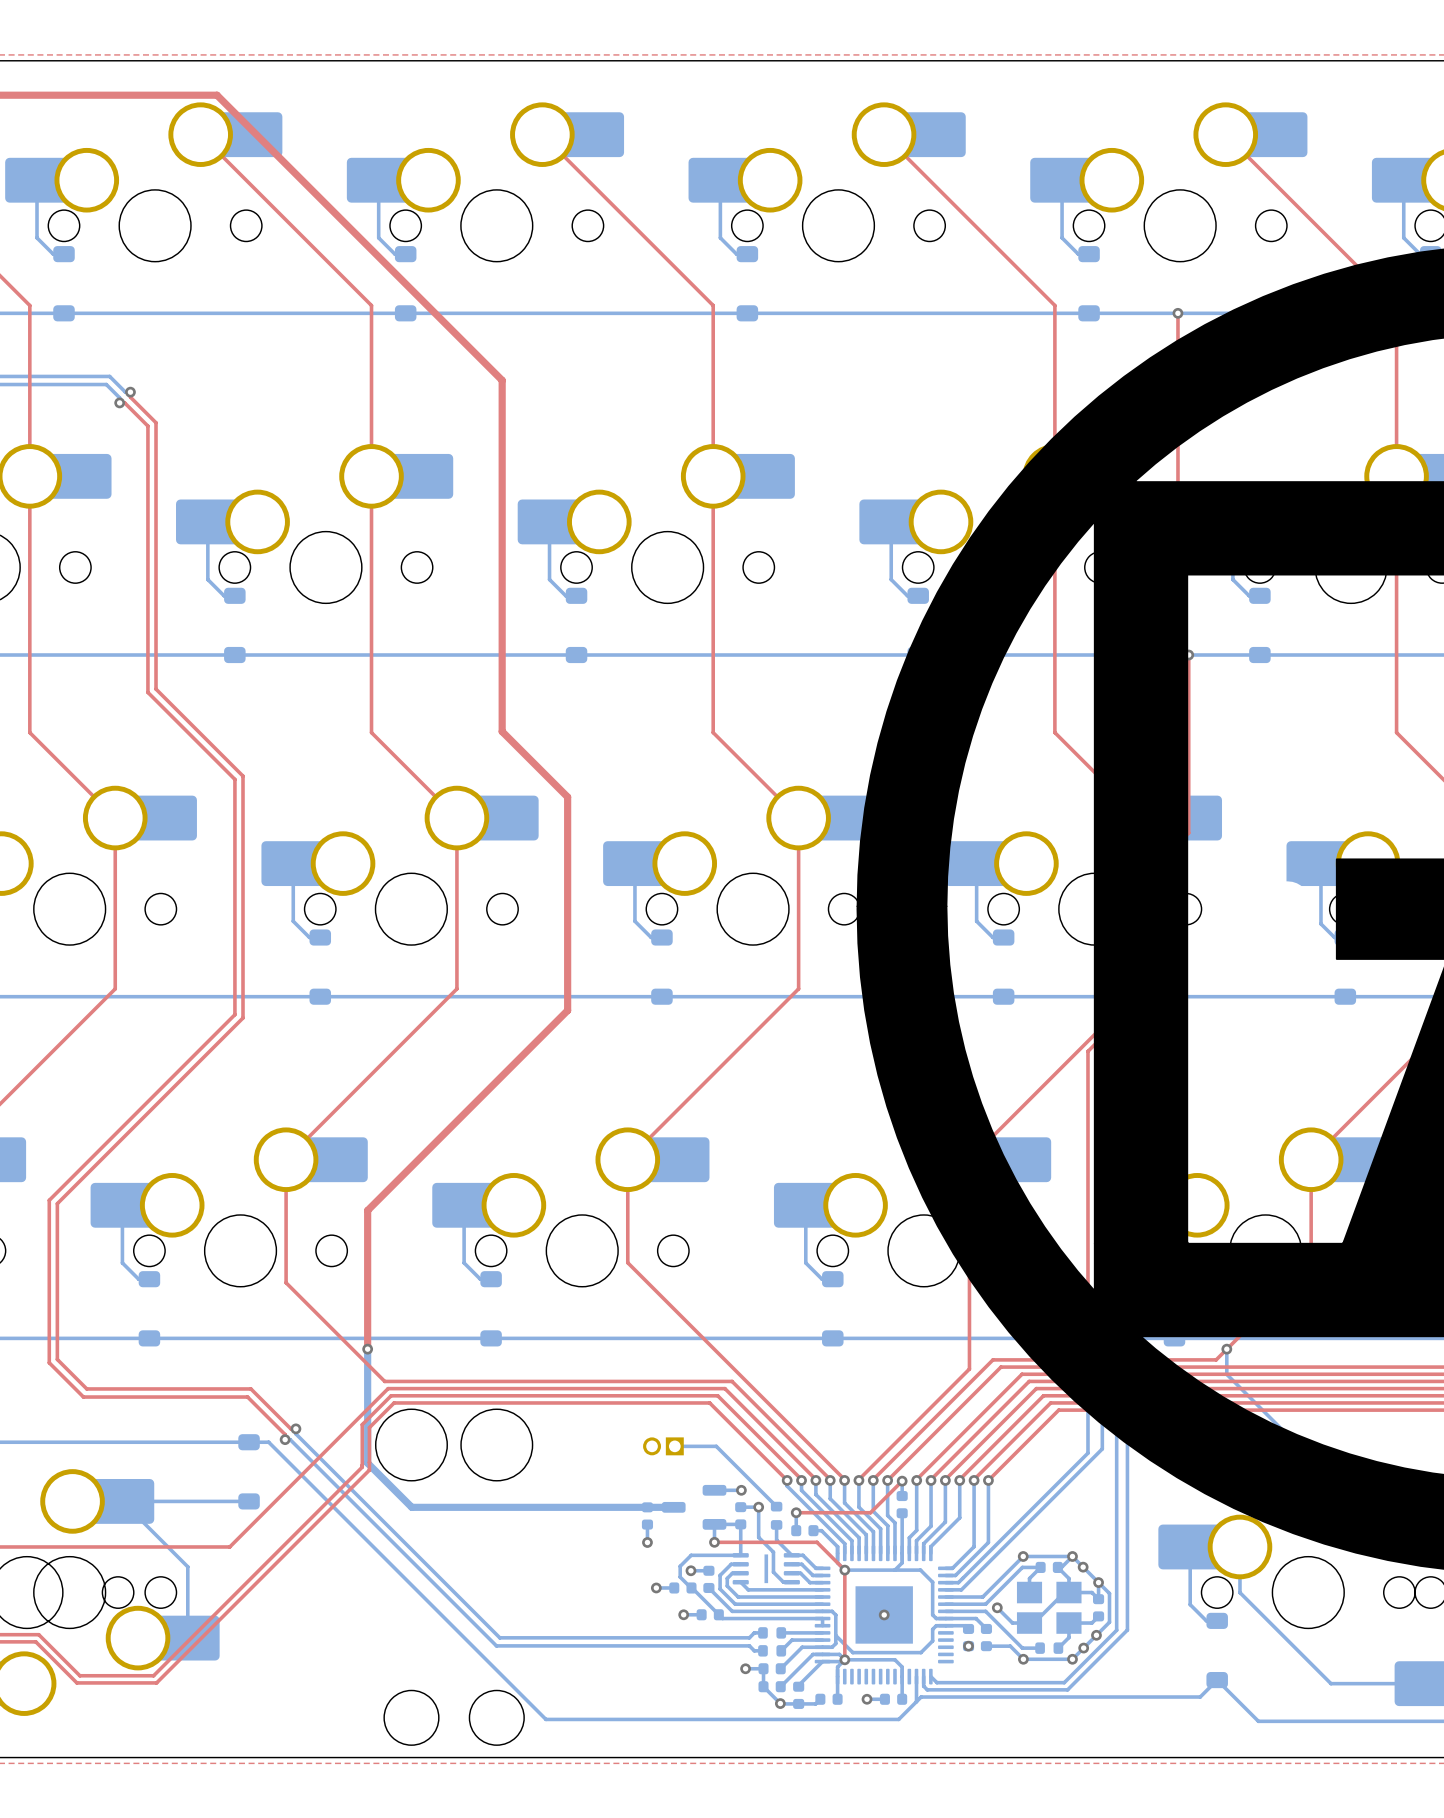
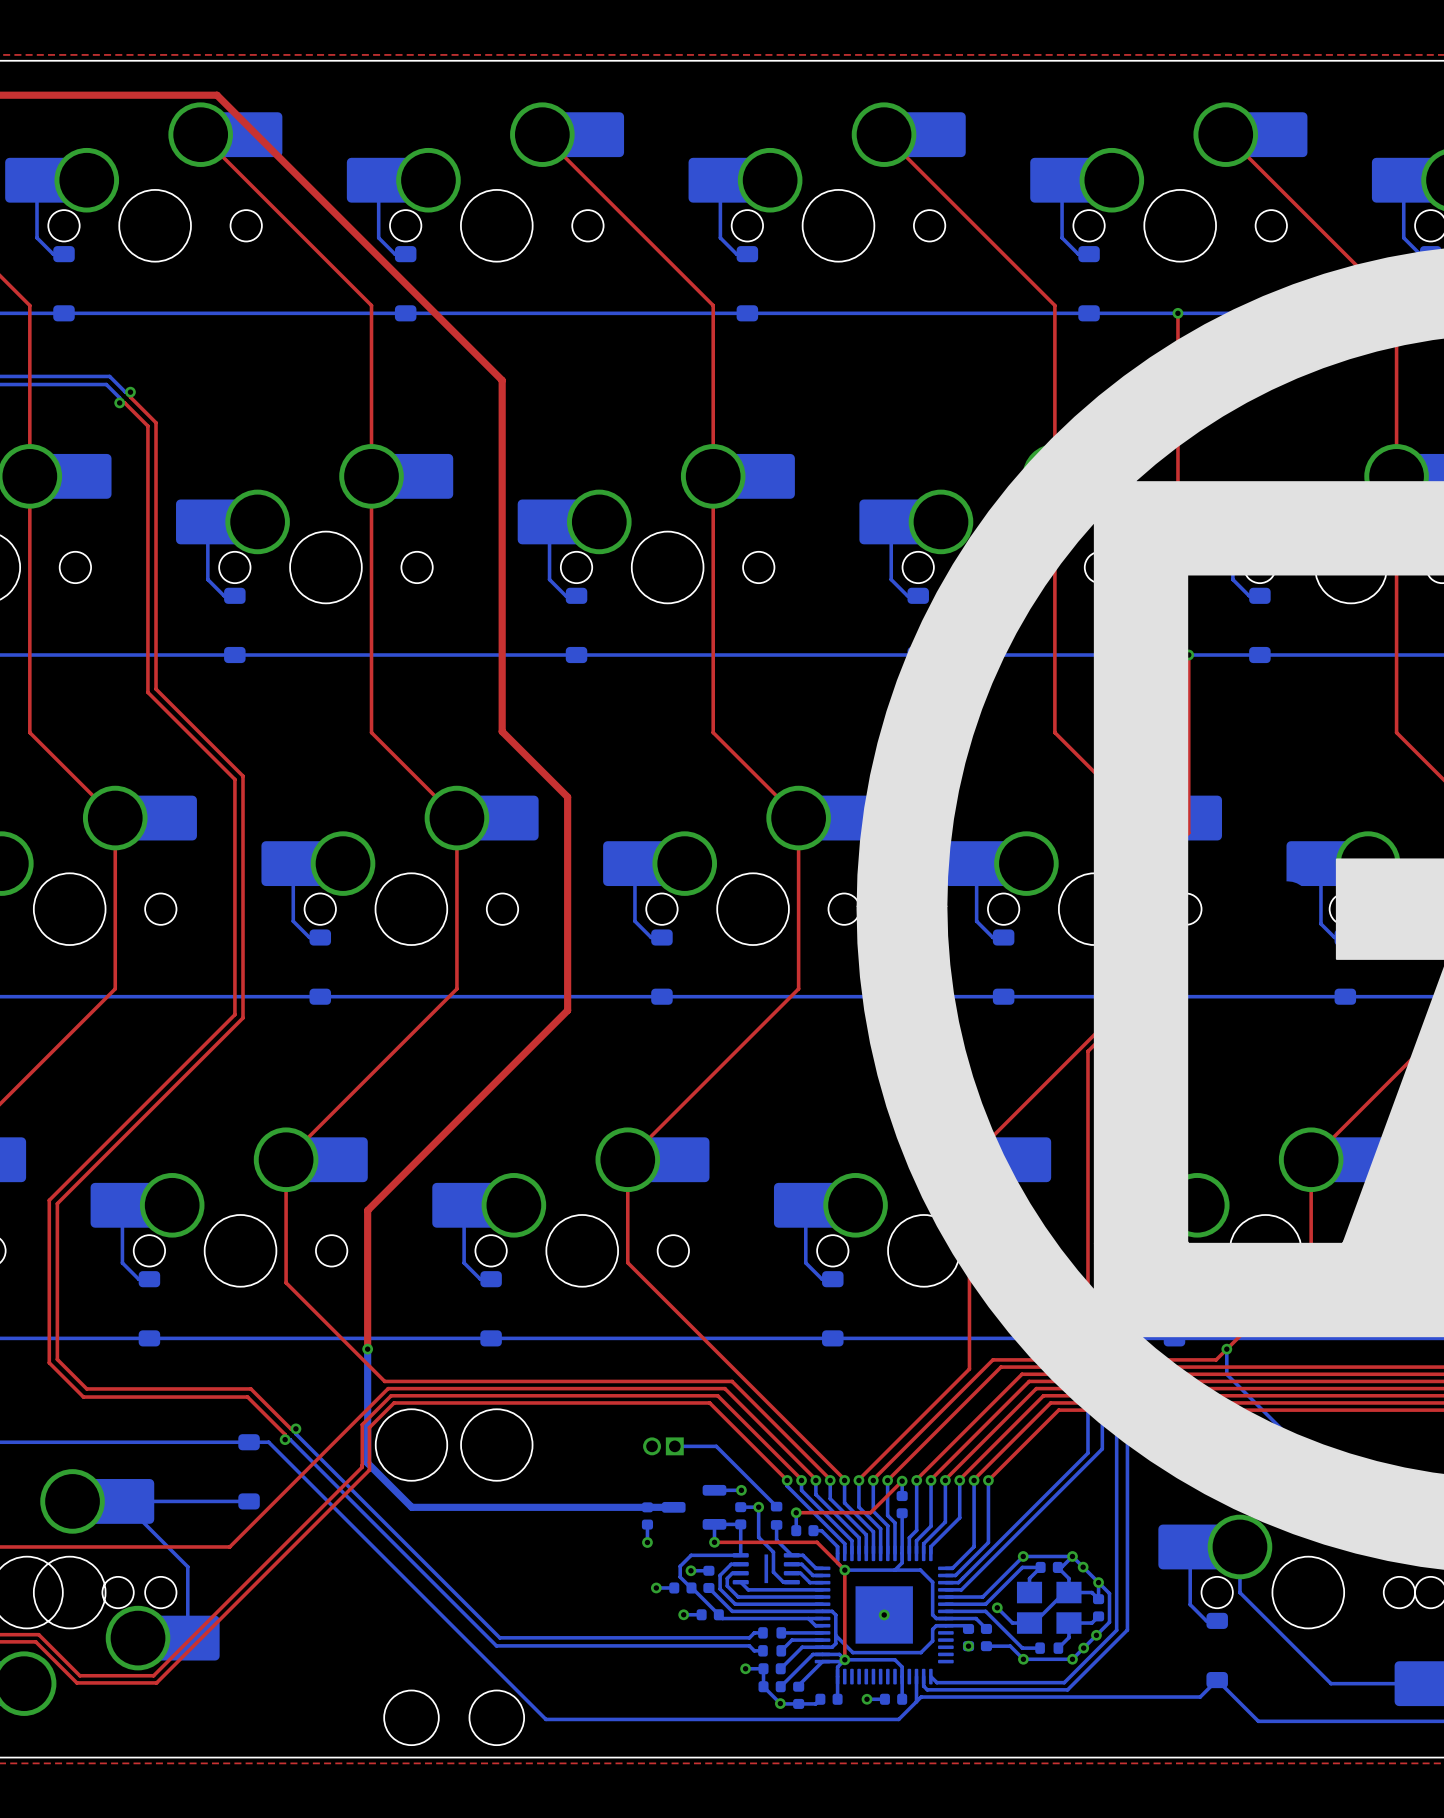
bottom track: (822, 1618) (822, 1625) -> (808, 1618) (815, 1625) (822, 1625)

